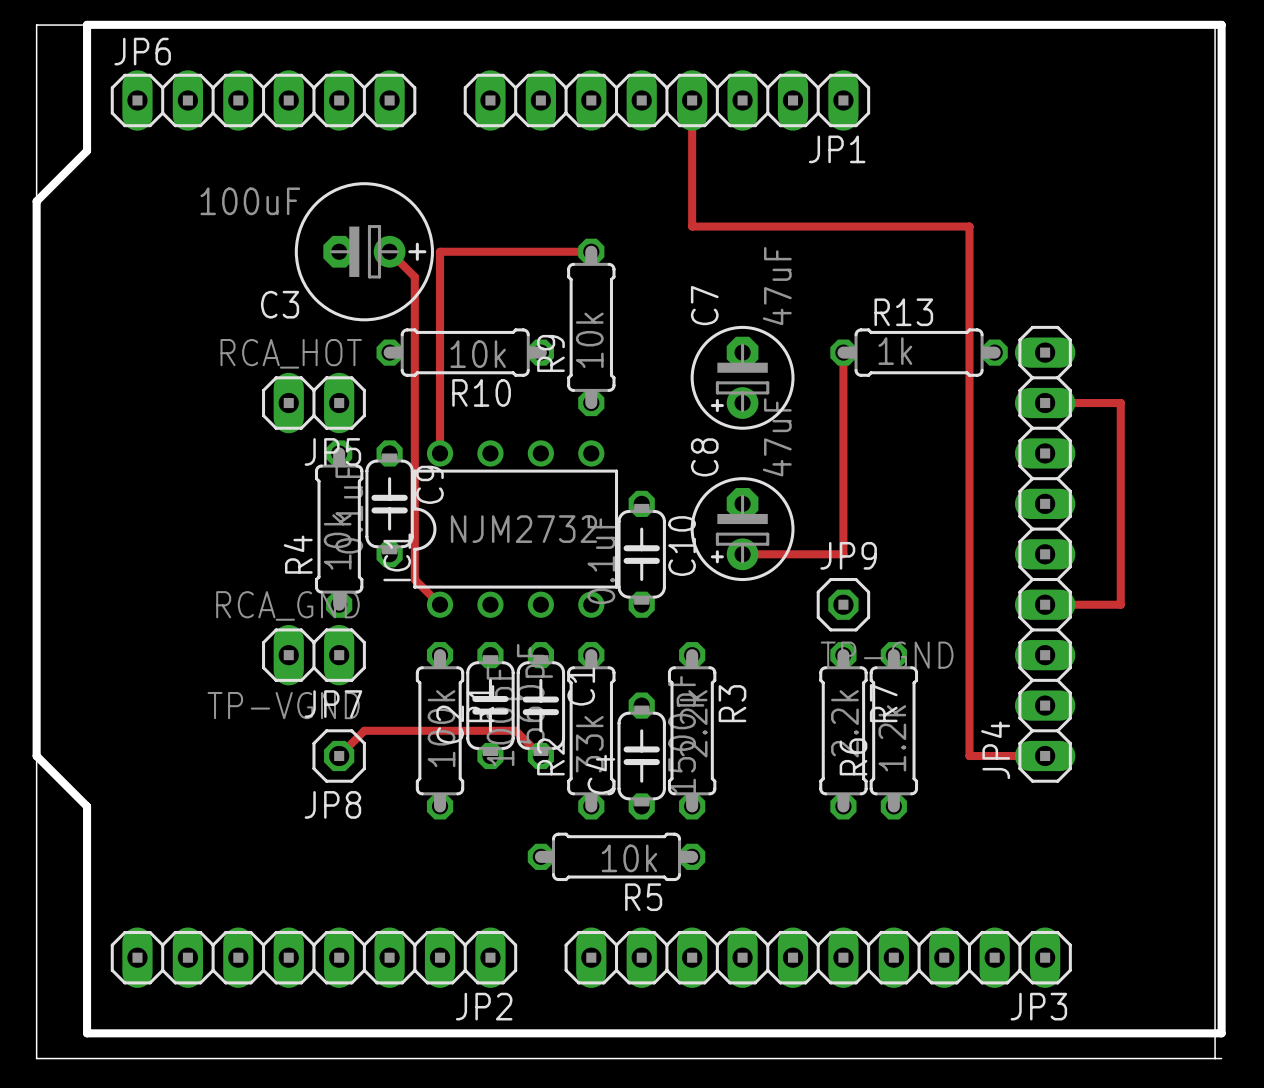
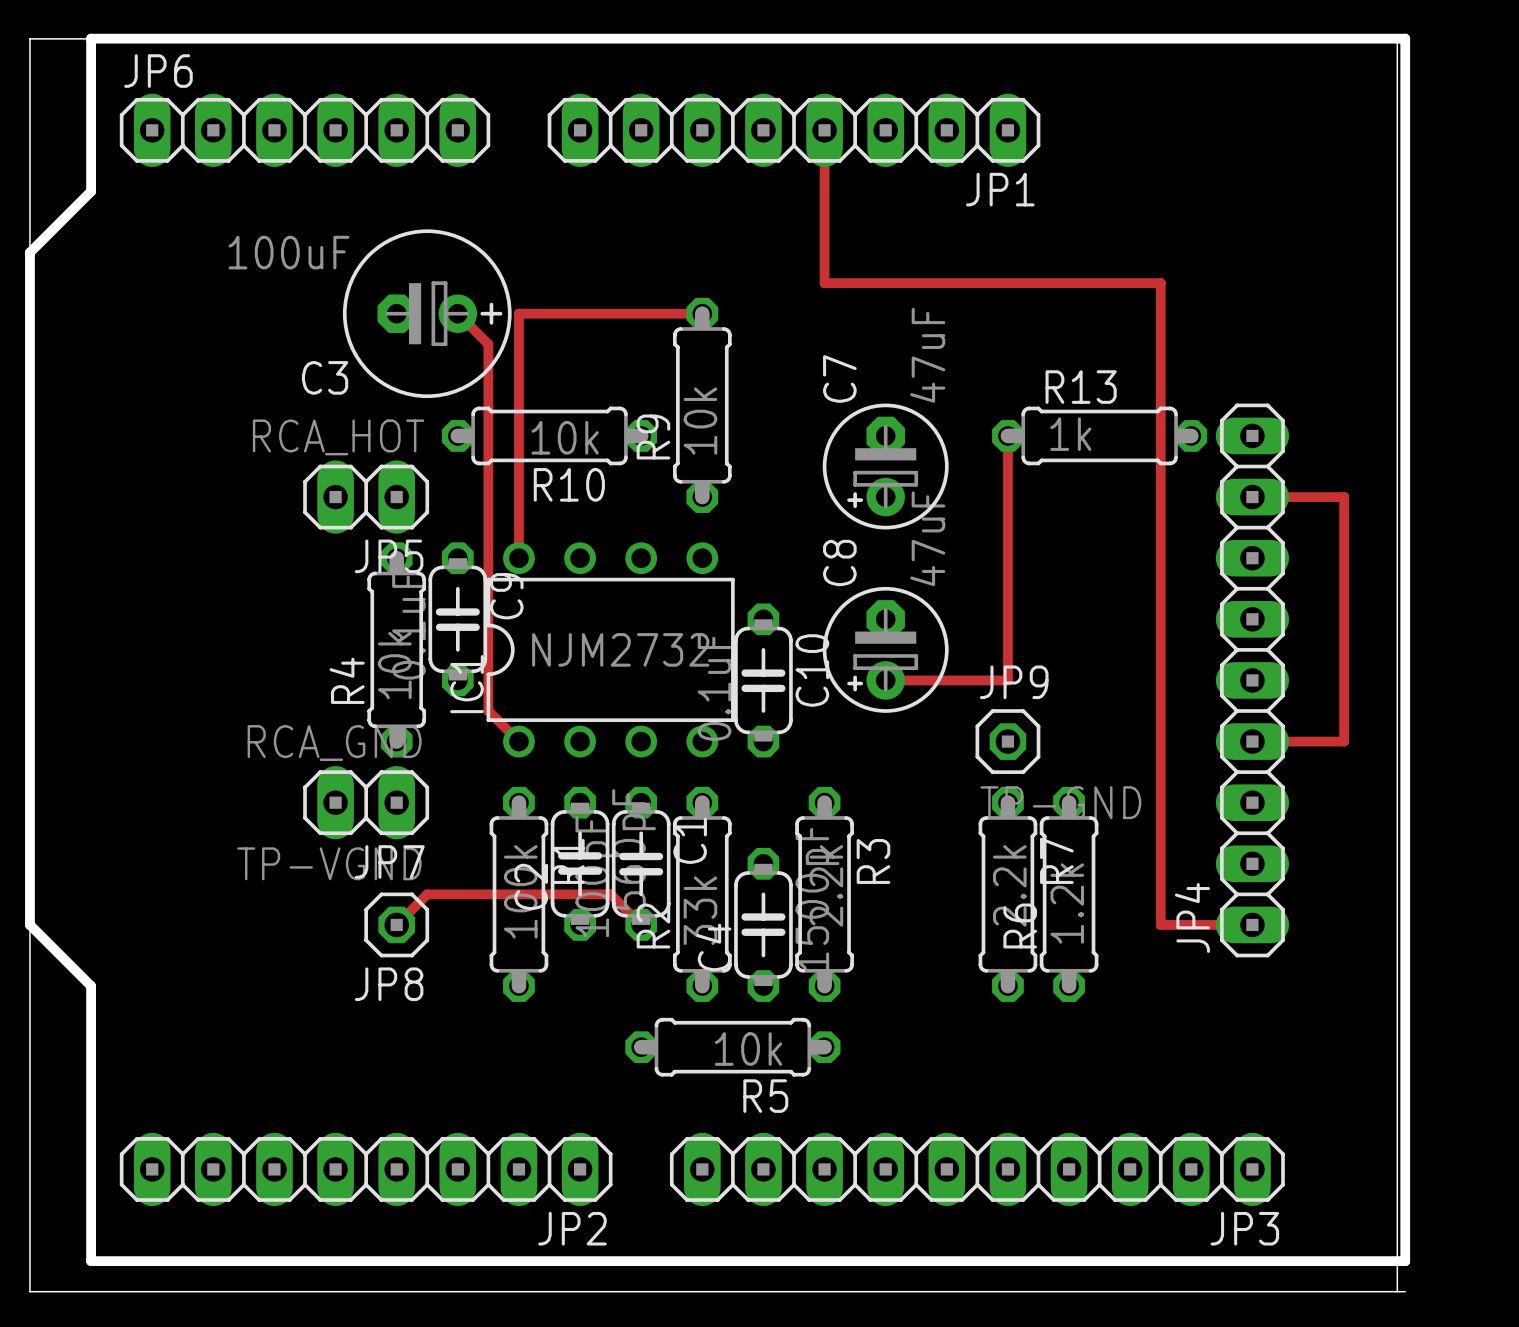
board edge: (1171, 24) (1221, 24) (1221, 1033) (1171, 1033) -> (1405, 38) (1405, 1261)
board edge: (1164, 25) (1215, 25) (1215, 1058) -> (1397, 38) (1397, 1291)
board edge: (1171, 1058) (1221, 1058) -> none

